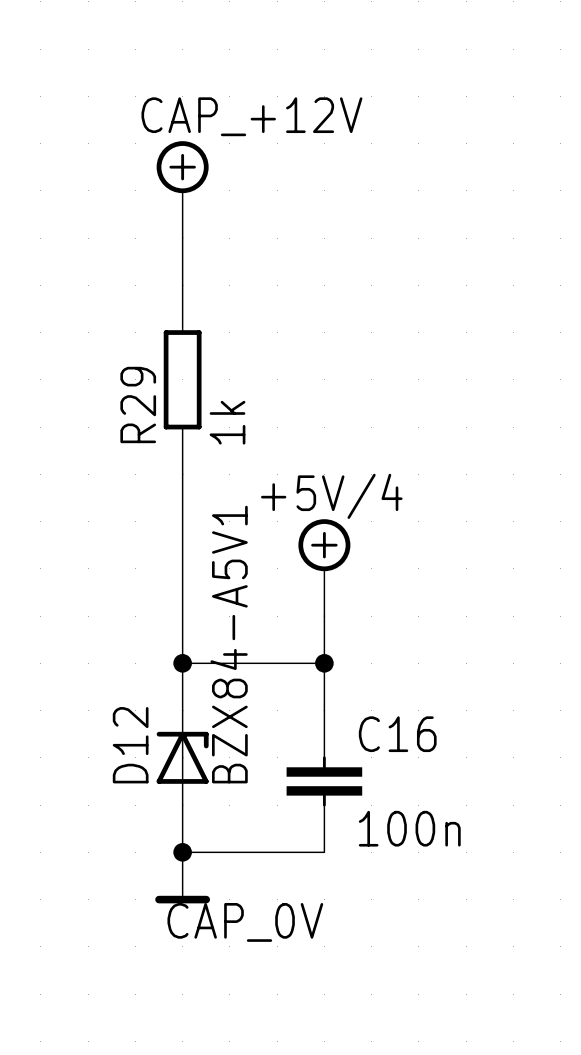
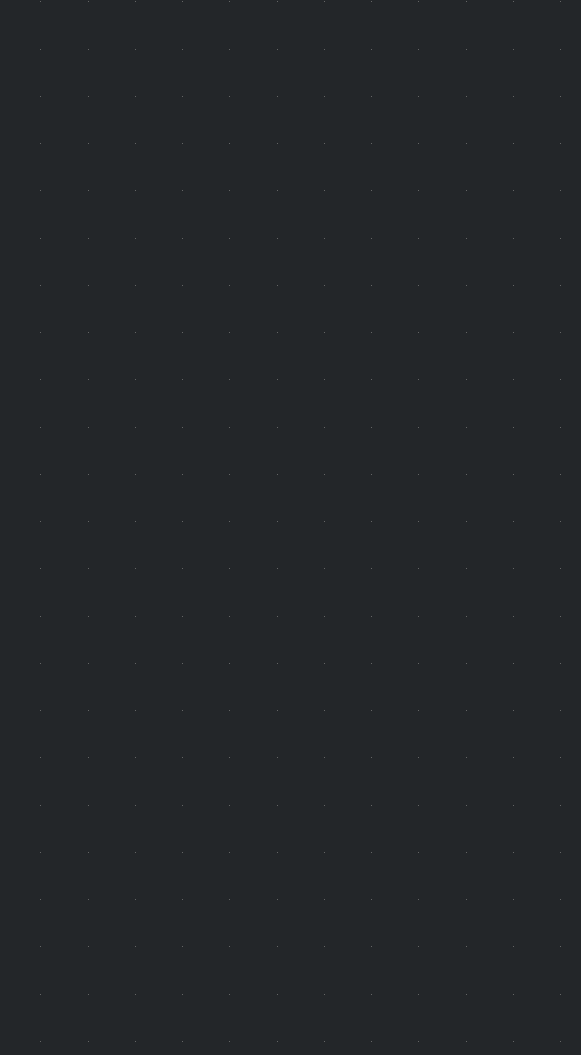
power symbol: CAP_+12V (182, 189) -> none
wire: (182, 238) (182, 285) -> none
R29: 1k (182, 379) -> none
wire: (182, 474) (182, 710) -> none
power symbol: +5V/4 (324, 567) -> none
wire: (324, 616) (324, 710) -> none
wire: (182, 663) (324, 663) -> none
junction: (182, 663) -> none
junction: (324, 663) -> none
D12: BZX84-A5V1 (182, 757) -> none
C16: 100n (324, 781) -> none
wire: (182, 805) (182, 852) (324, 852) -> none
junction: (182, 852) -> none
power symbol: CAP_0V (182, 877) -> none

